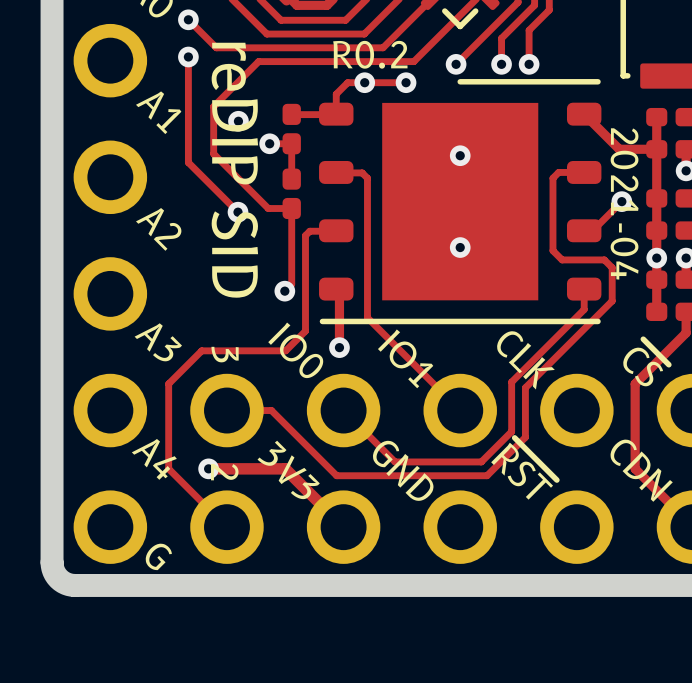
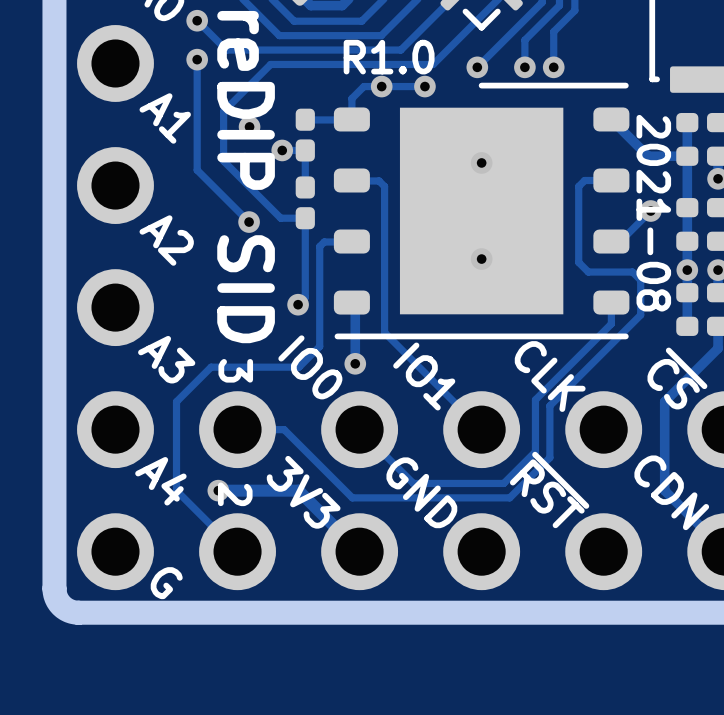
text: R0.2 (370, 54) -> R1.0 (389, 57)
text: 2021-04 (624, 203) -> 2021-08 (653, 213)

